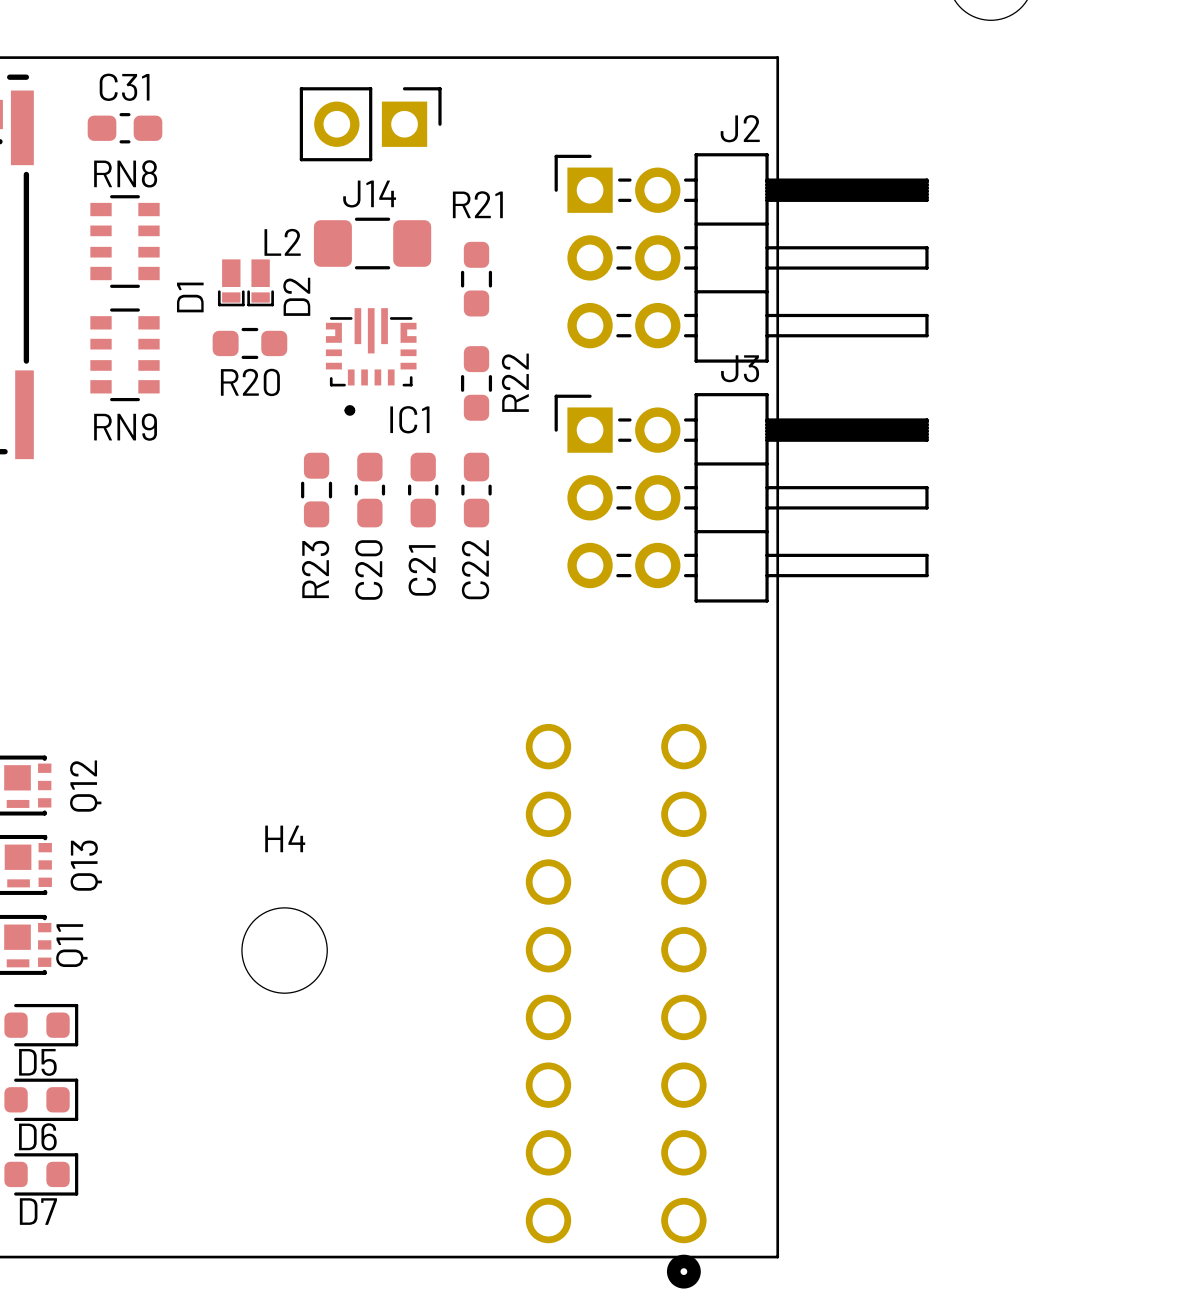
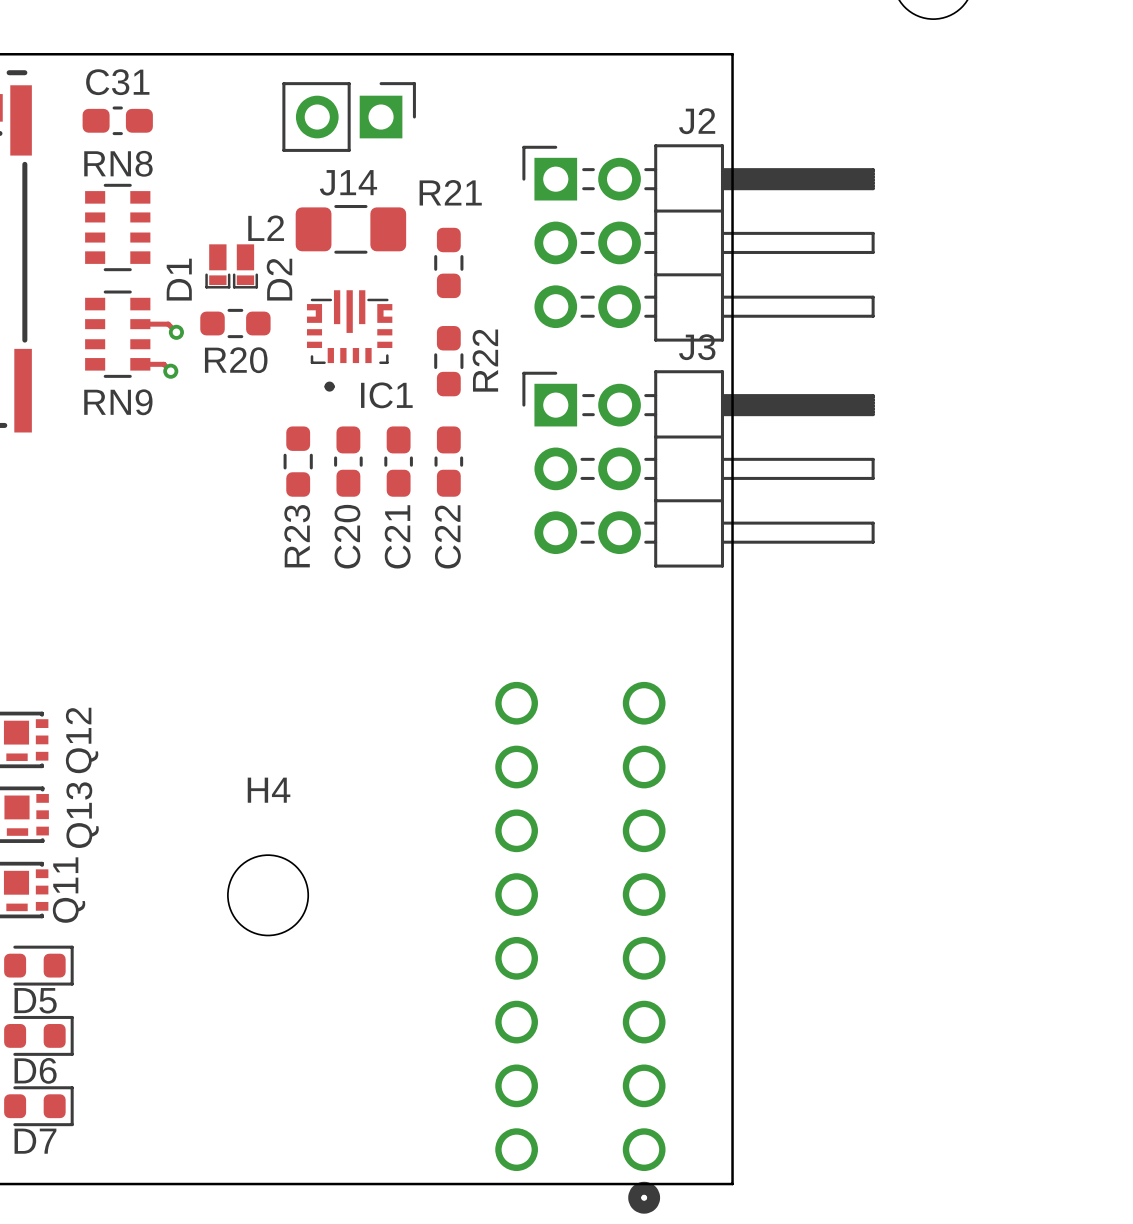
track: none -> (140, 324) (168, 324) (176, 332)
via: none -> (176, 332)
track: none -> (140, 364) (163, 364) (170, 371)
via: none -> (170, 371)

